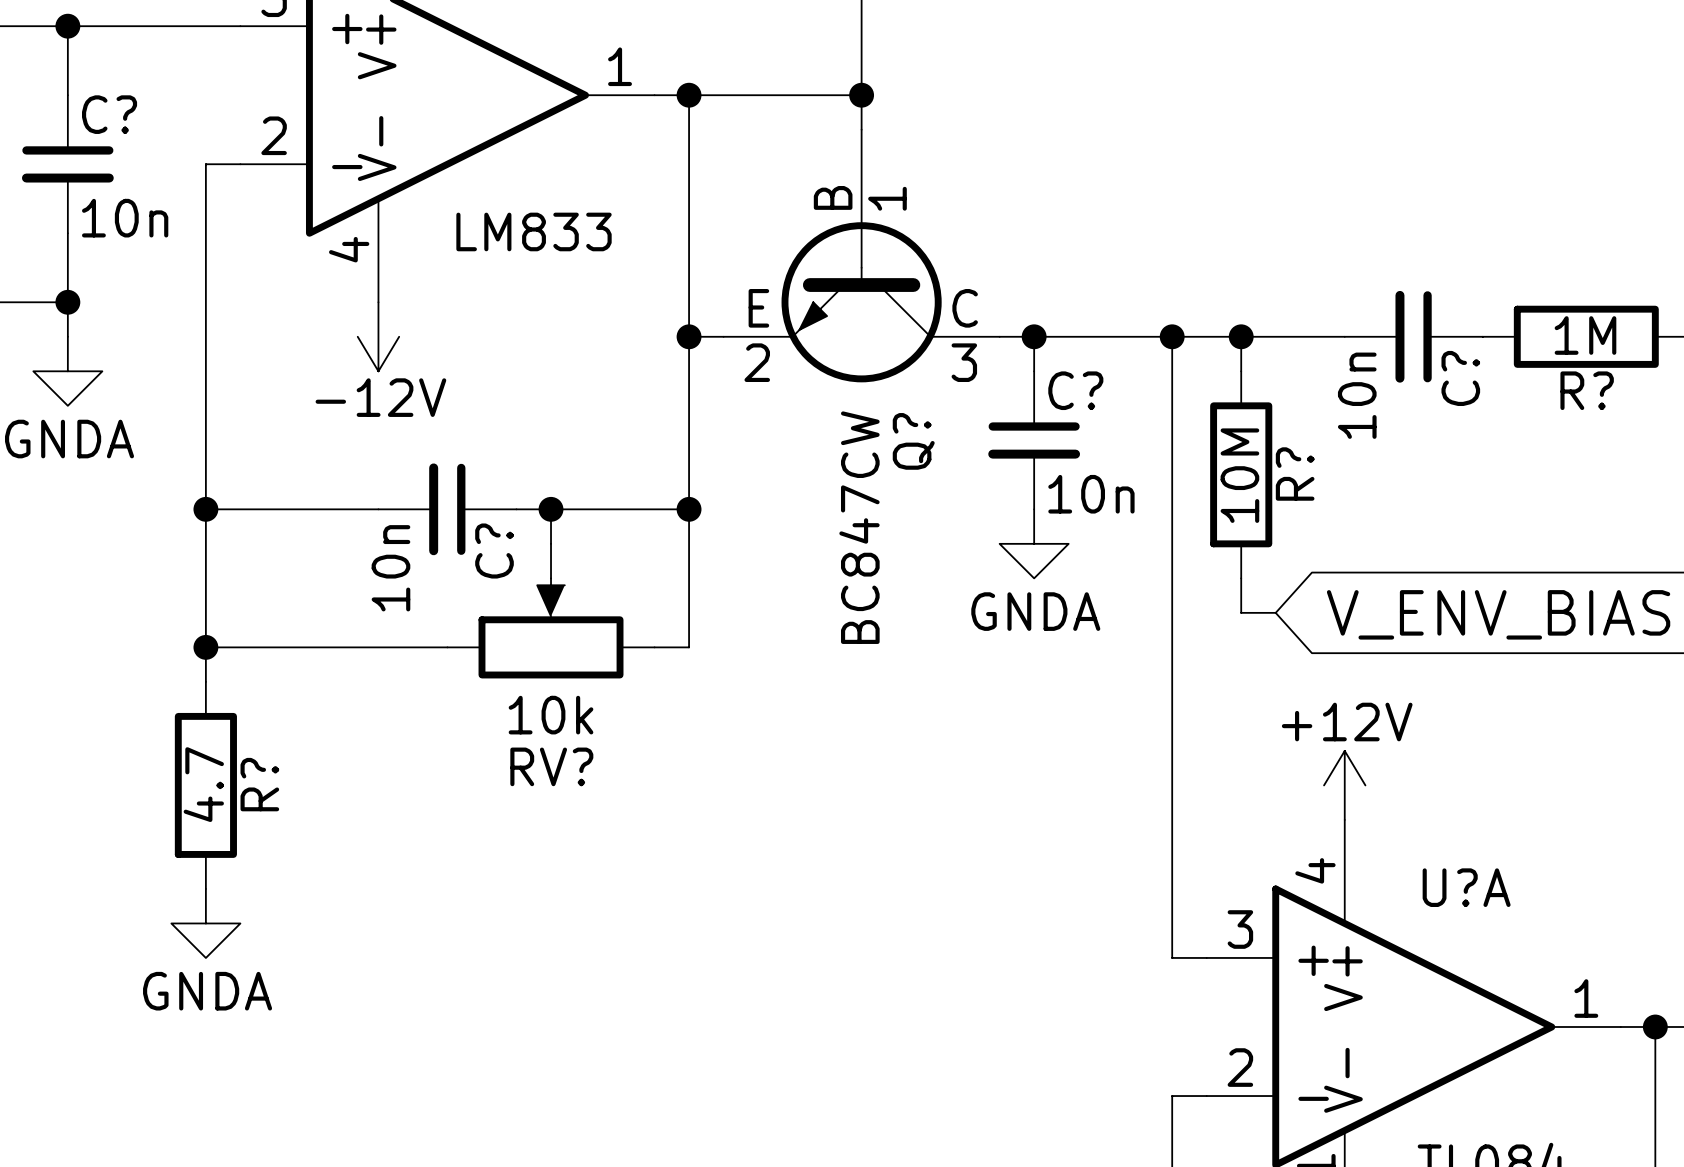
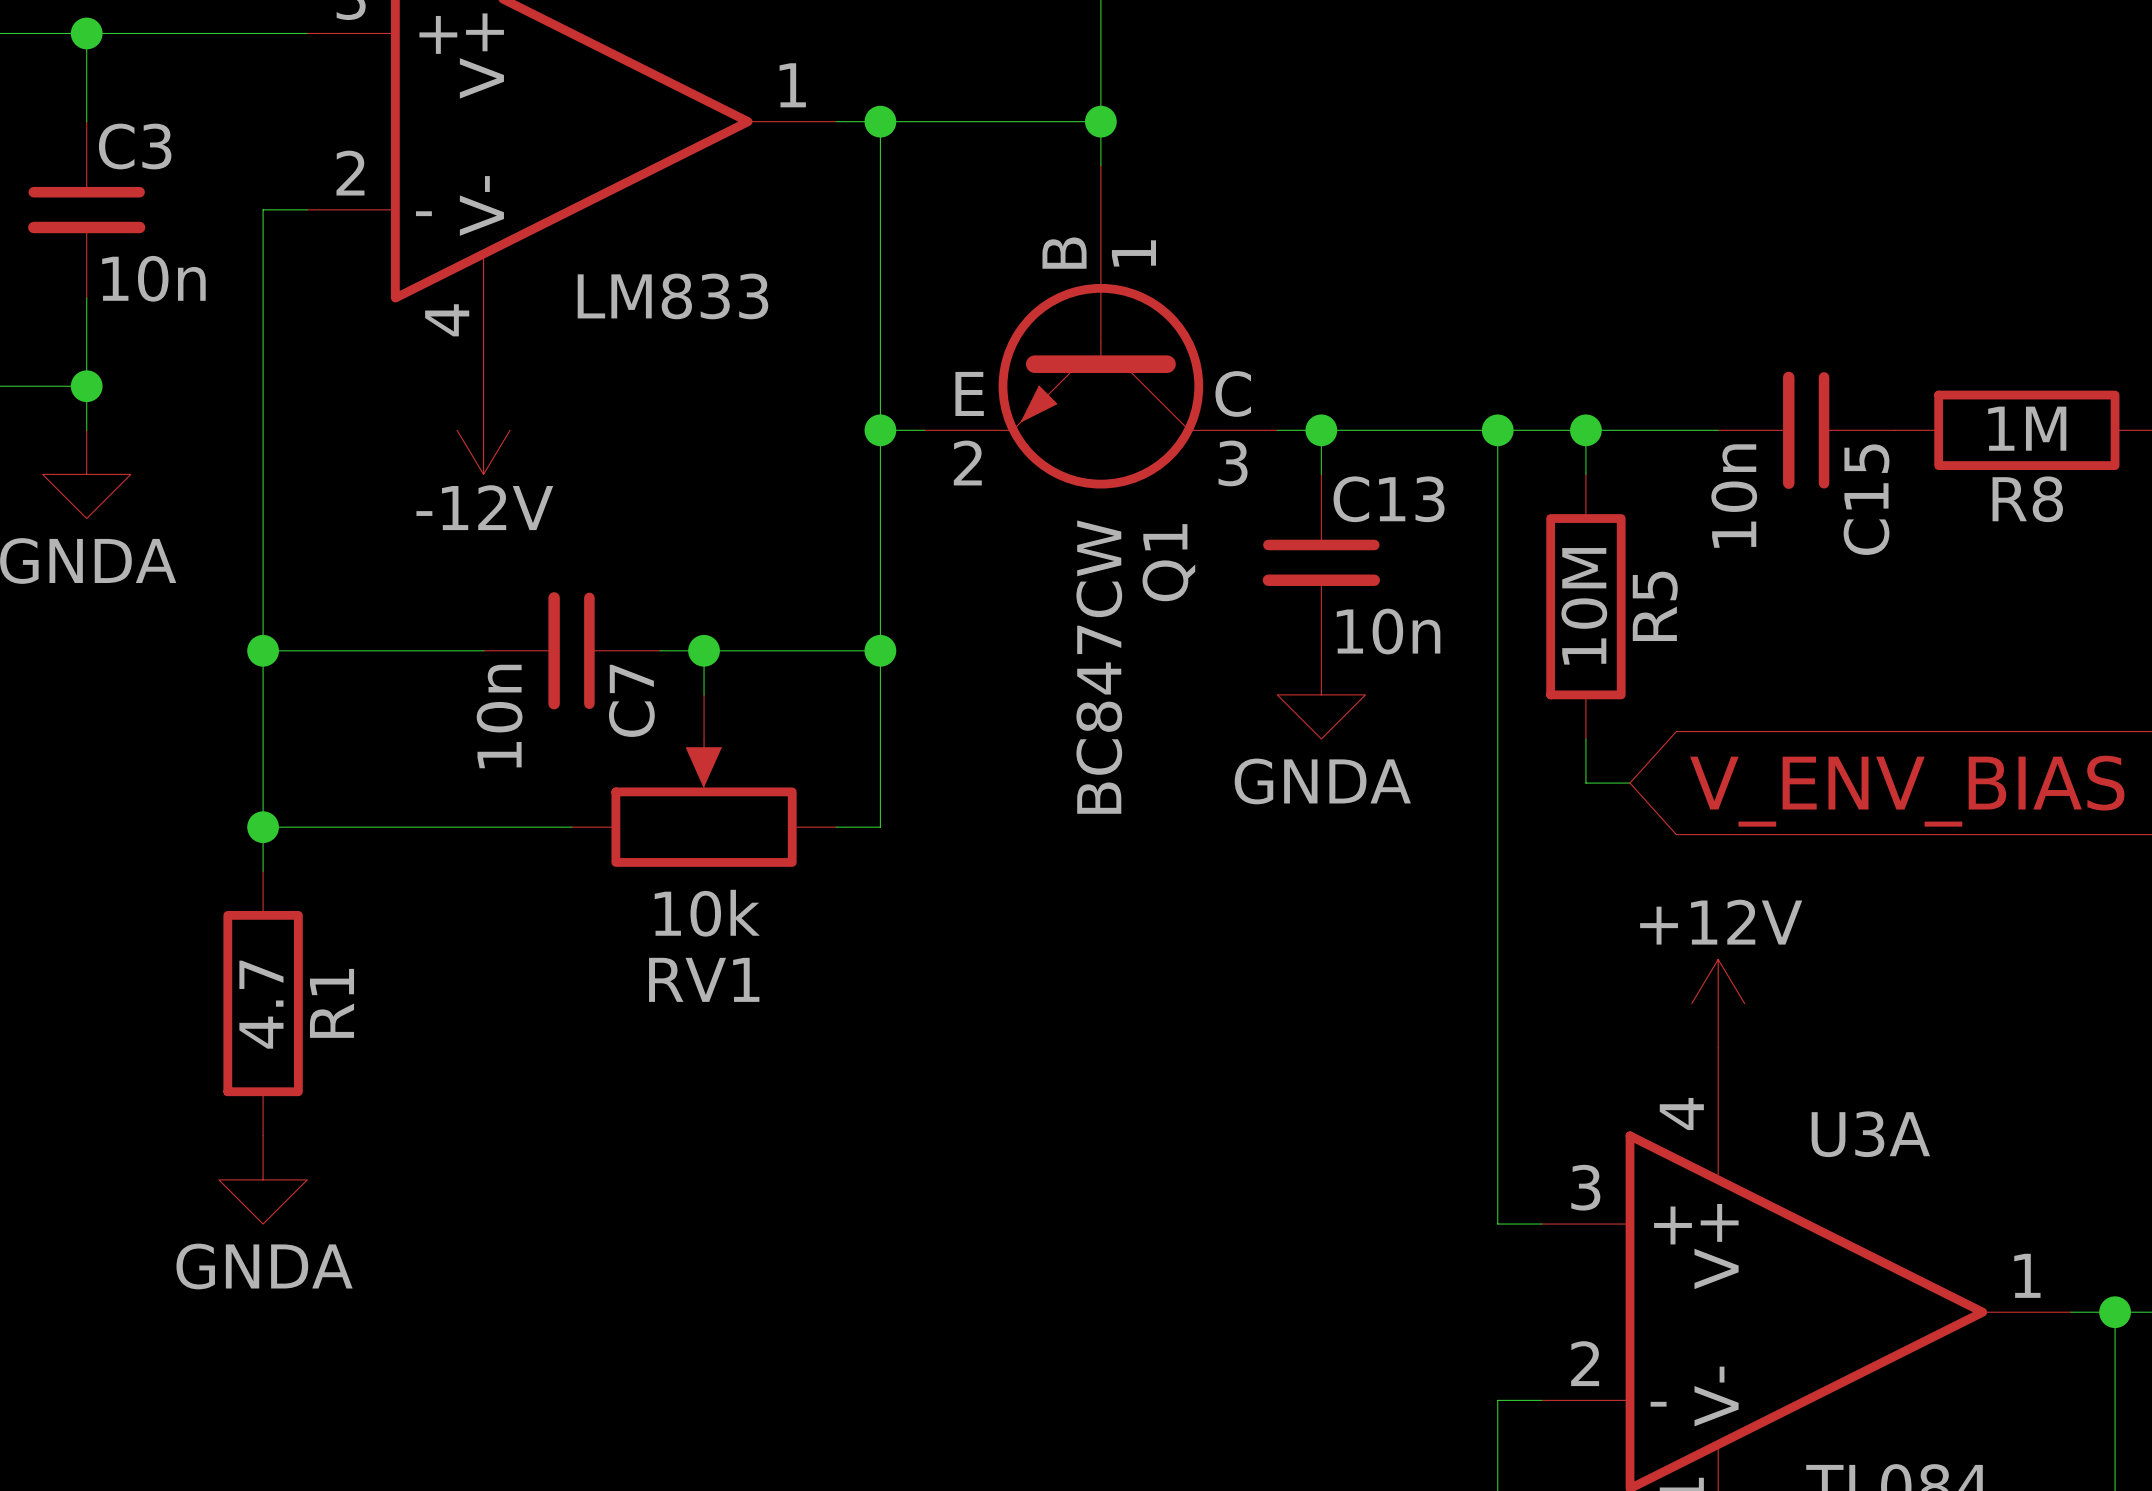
C? name: C? (109, 114) -> C3 (135, 146)
C? name: C? (1460, 378) -> C15 (1866, 499)
C? name: C? (1075, 390) -> C13 (1389, 499)
R? name: R? (1587, 390) -> R8 (2027, 499)
Q? name: Q? (913, 441) -> Q1 (1168, 562)
R? name: R? (1295, 474) -> R5 (1655, 606)
C? name: C? (494, 551) -> C7 (631, 700)
RV? name: RV? (551, 766) -> RV1 (704, 979)
R? name: R? (259, 784) -> R1 (331, 1003)
U?A name: U?A (1466, 887) -> U3A (1870, 1134)

